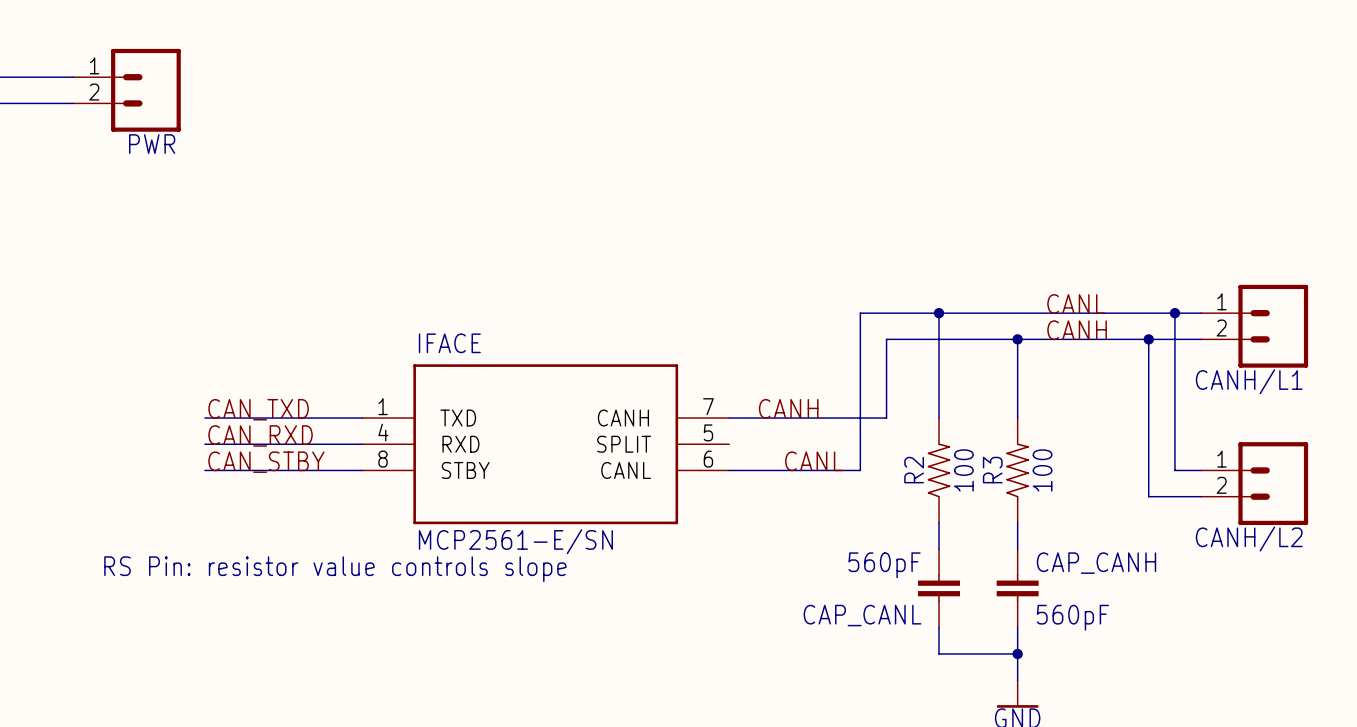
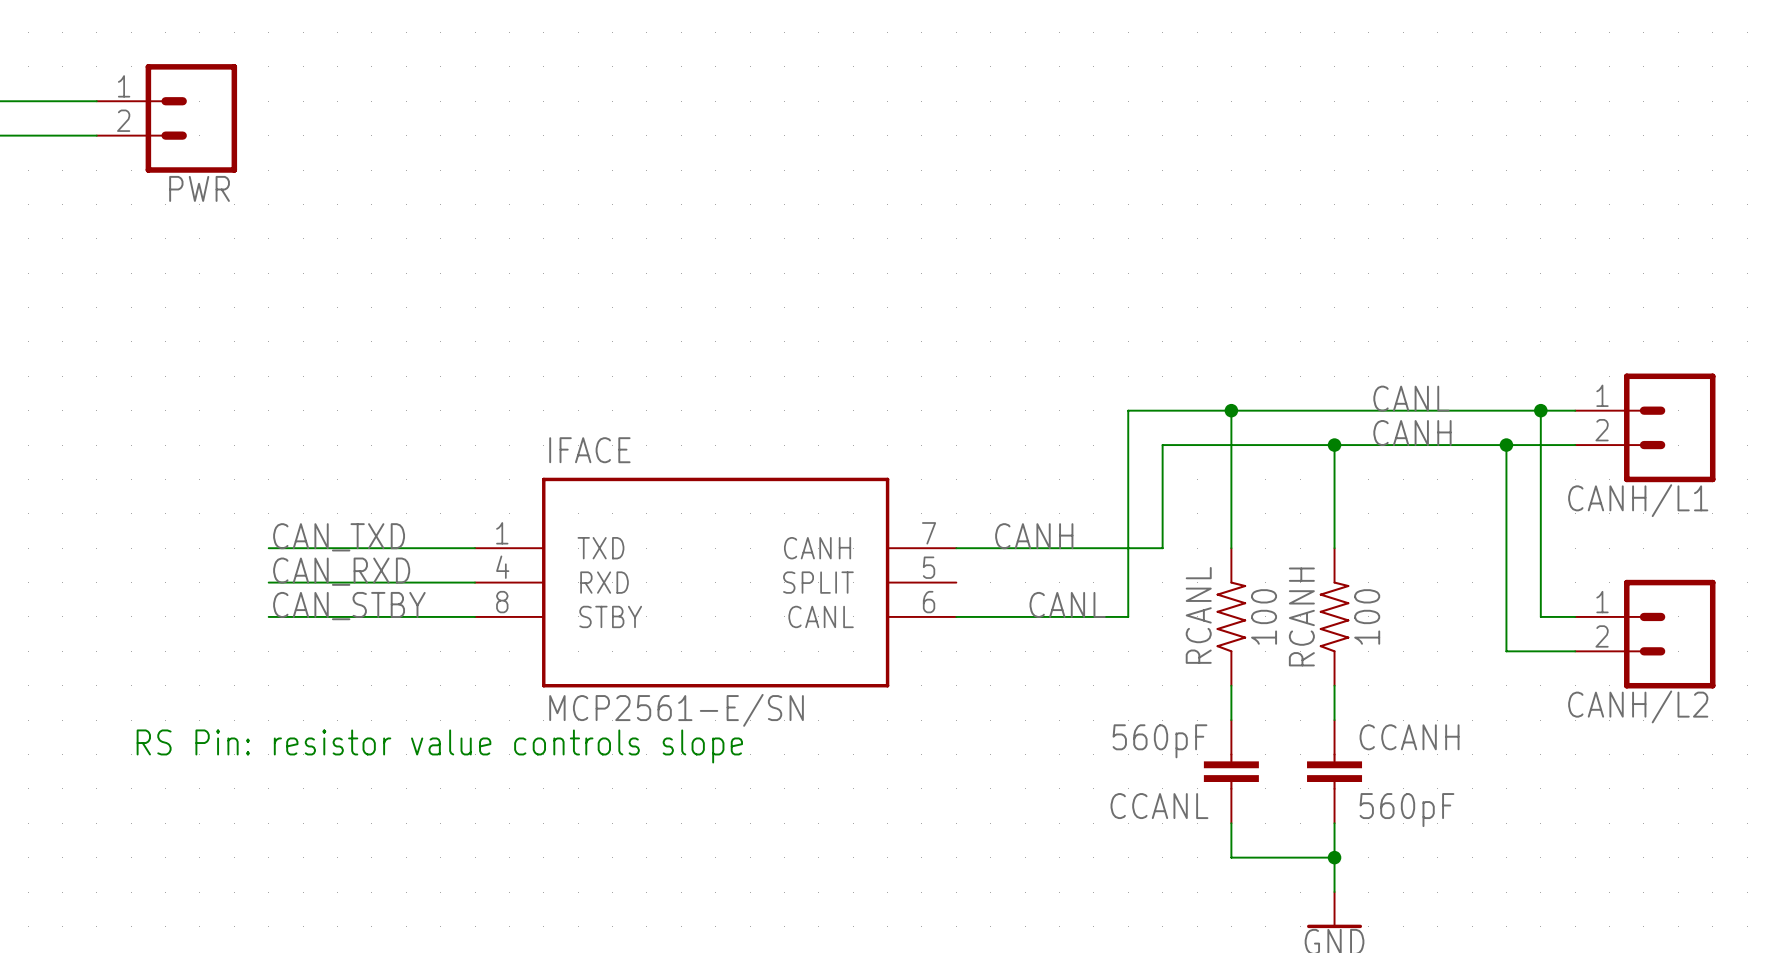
R2 name: R2 (914, 470) -> RCANL (1198, 615)
R3 name: R3 (992, 470) -> RCANH (1301, 616)
CAP_CANH name: CAP_CANH (1096, 563) -> CCANH (1409, 737)
CAP_CANL name: CAP_CANL (862, 615) -> CCANL (1159, 806)

